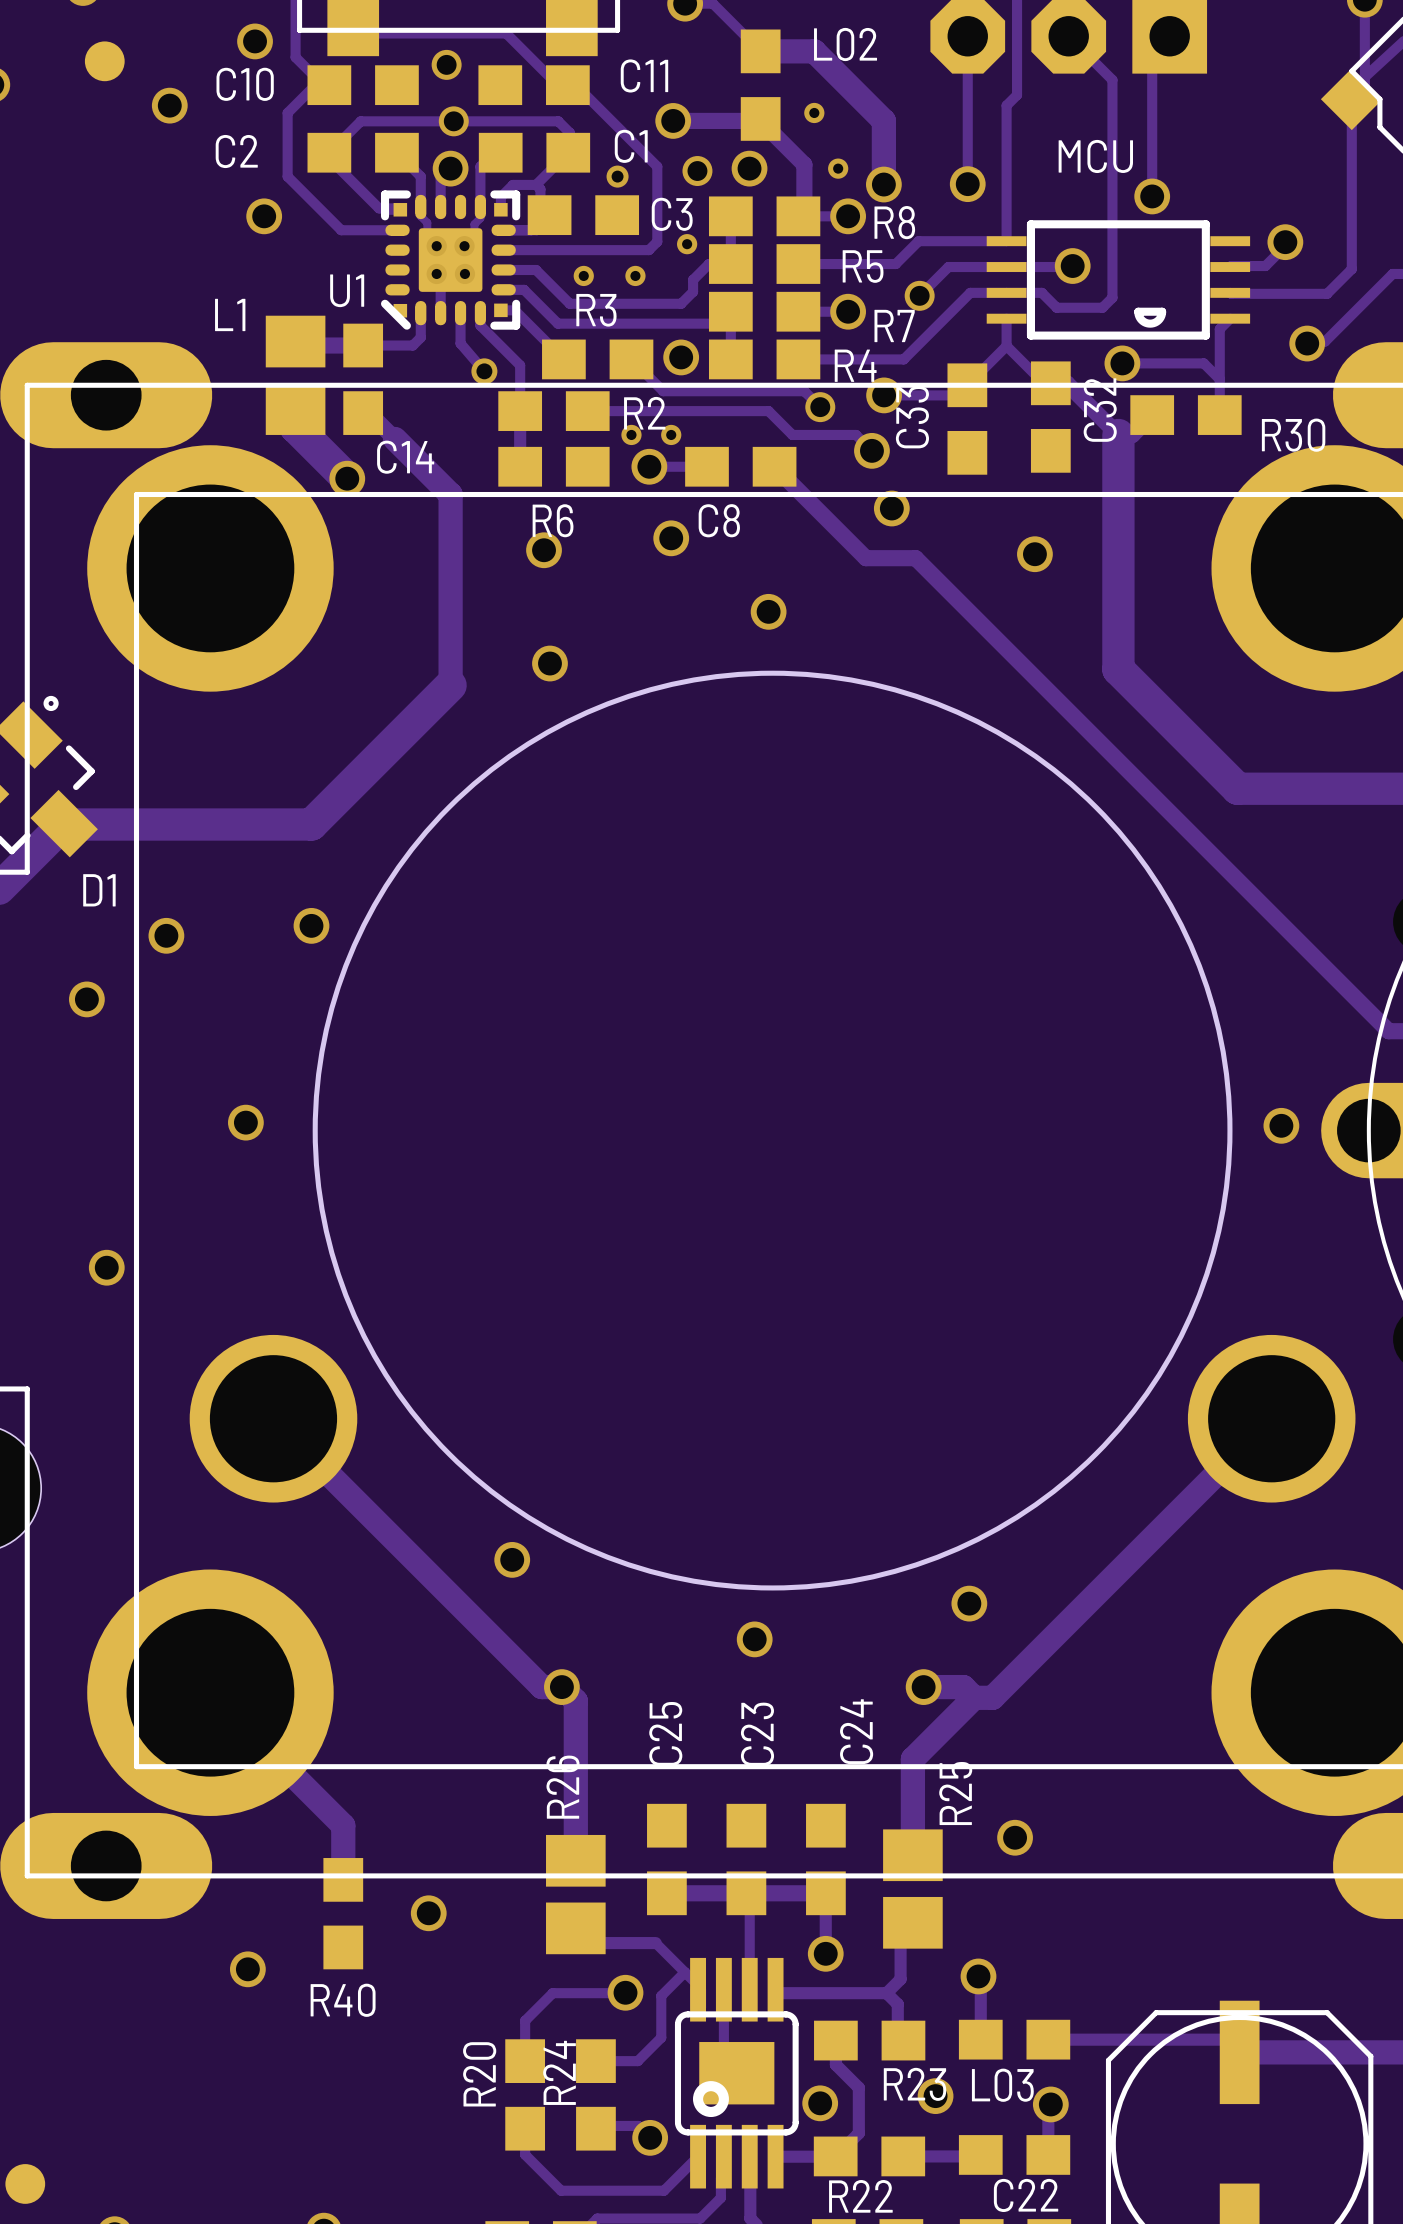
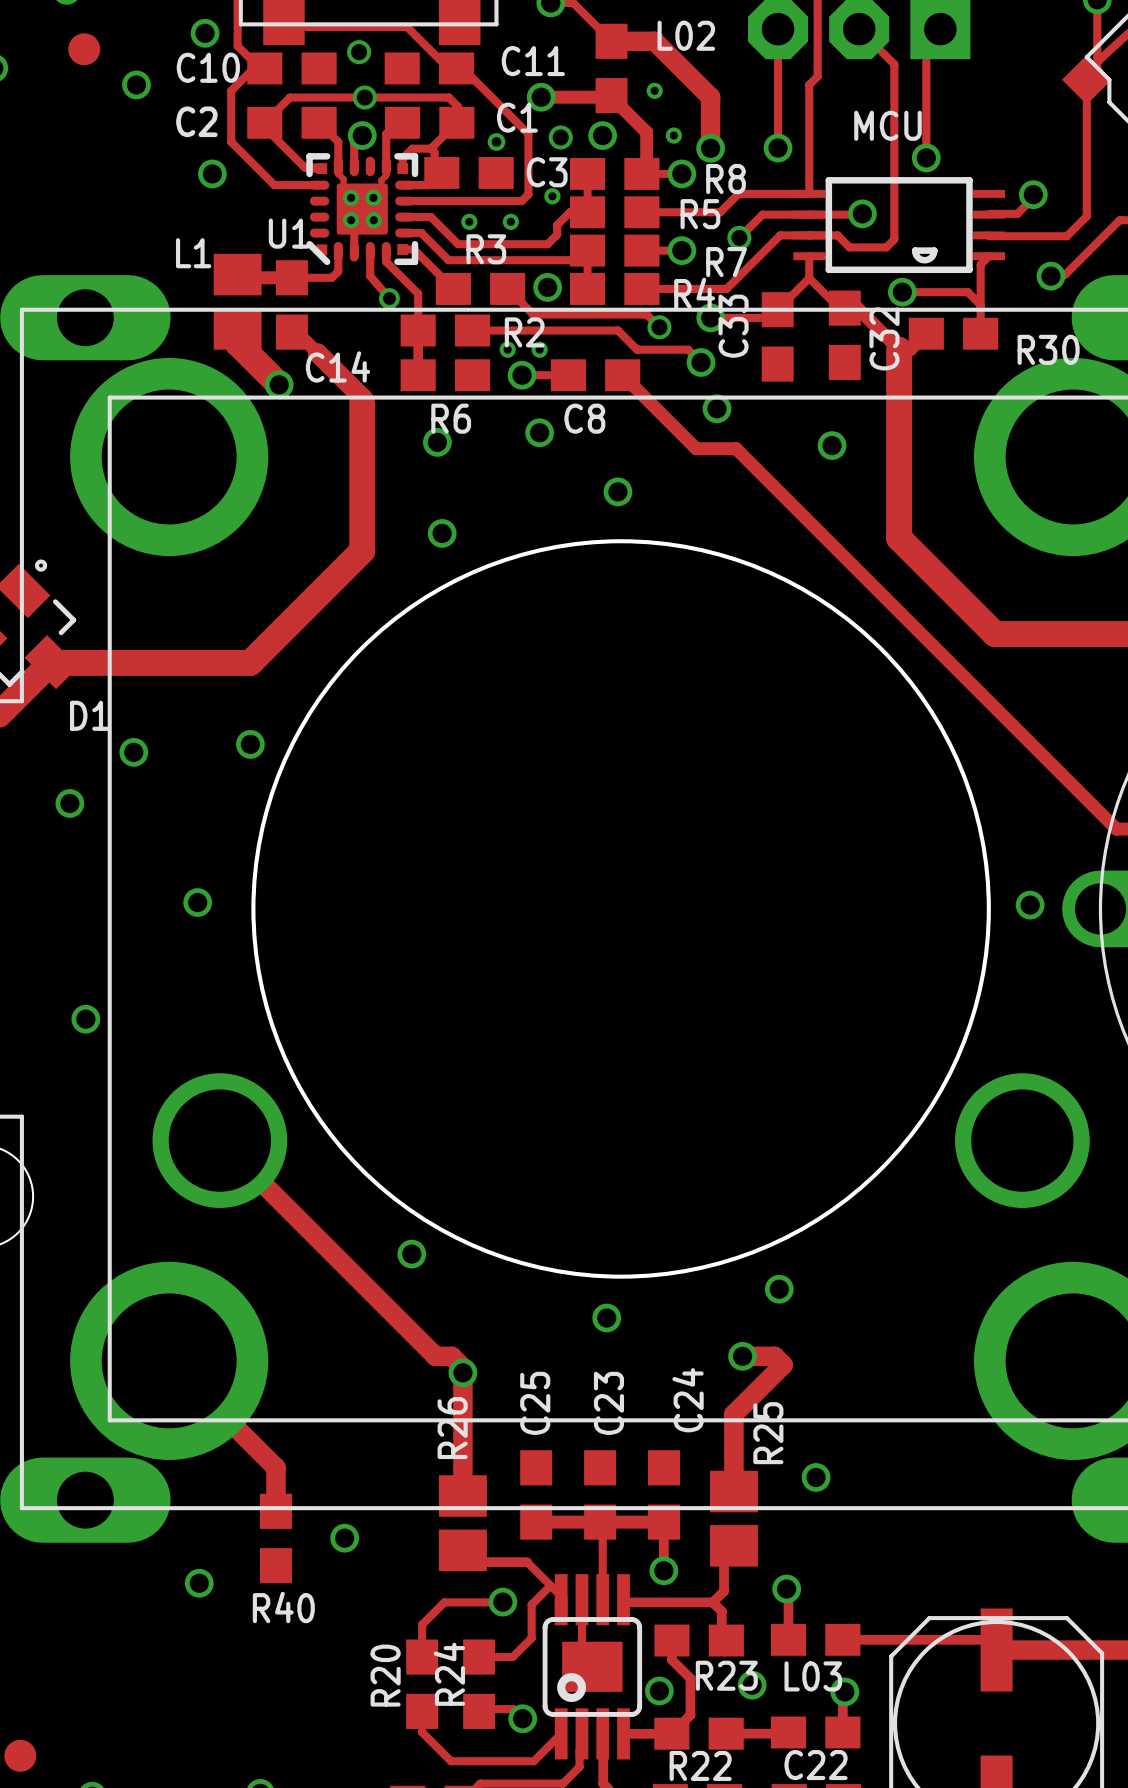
track width: thin (450, 500) (450, 685) -> thick (362, 402) (362, 551)
track: (1271, 1418) (992, 1697) (974, 1697) -> none
via position: (561, 1687) -> (462, 1372)

